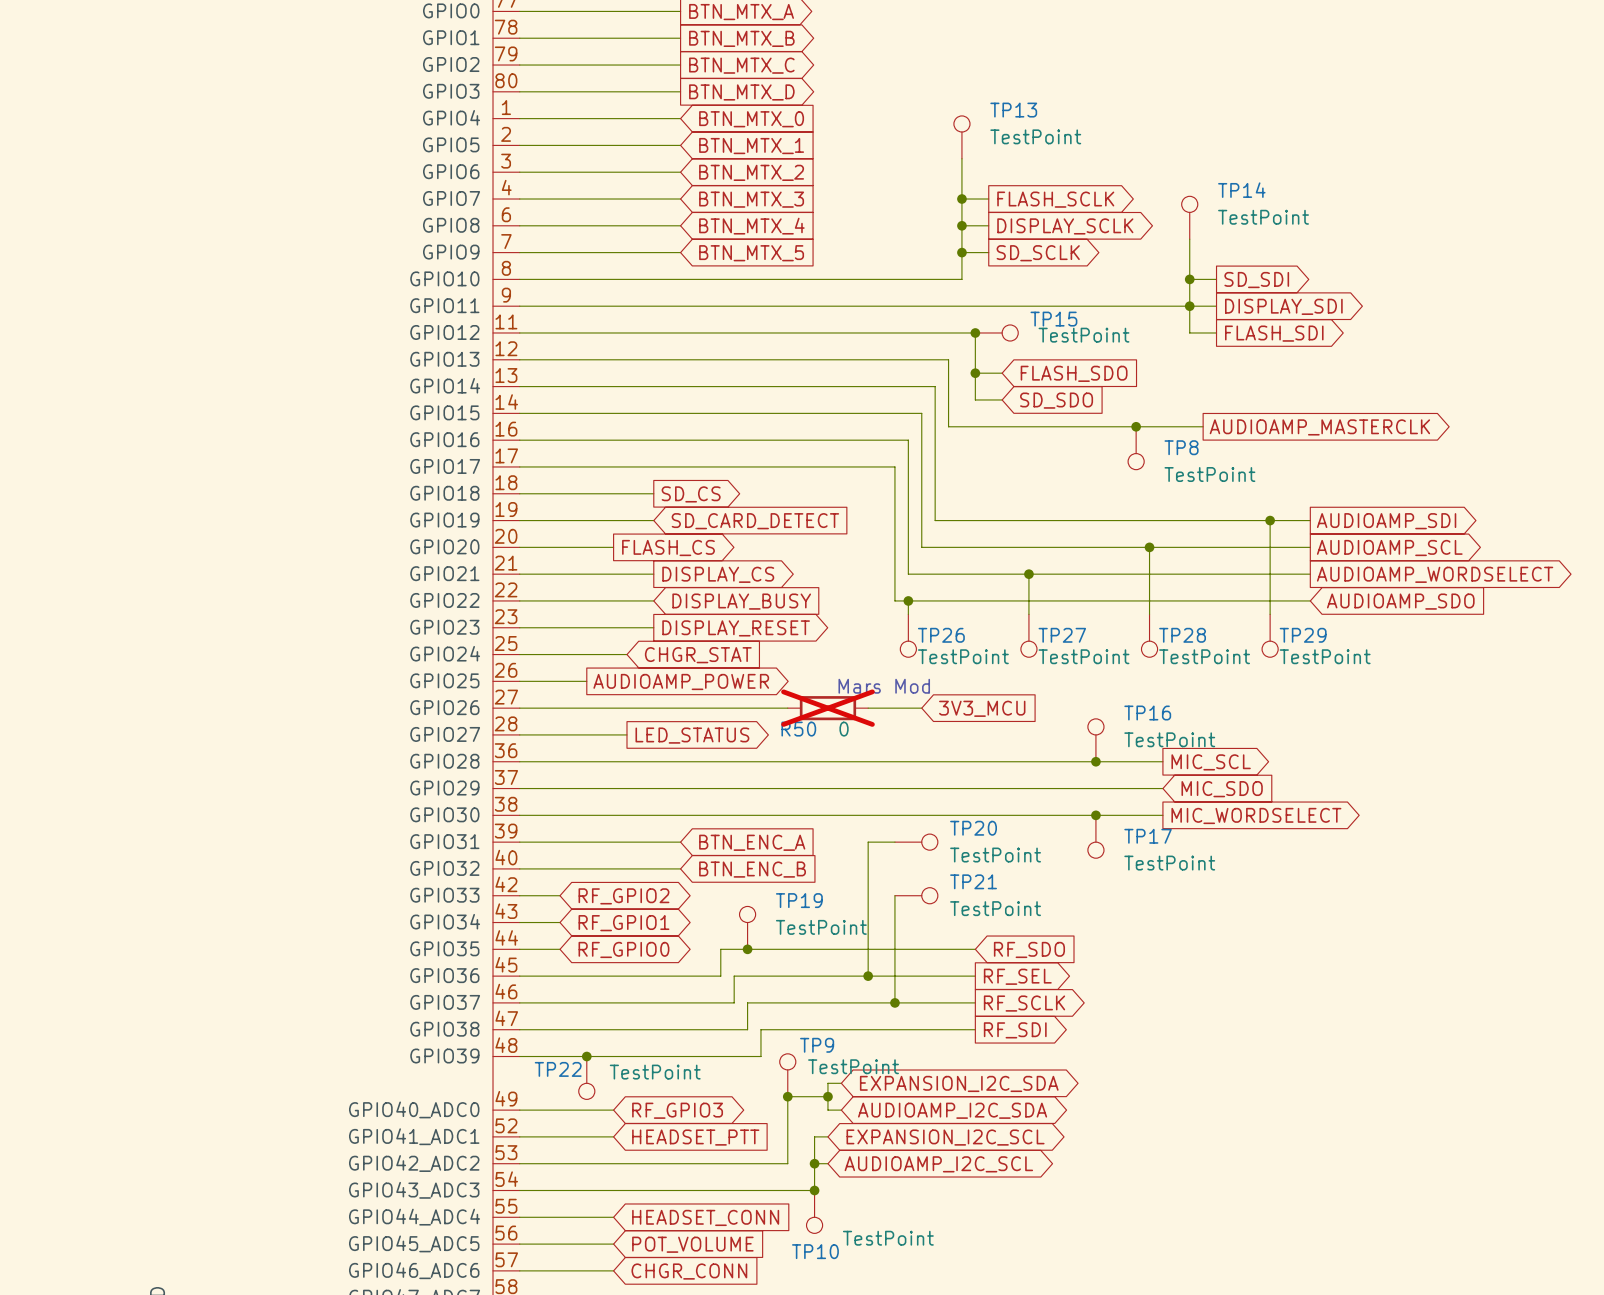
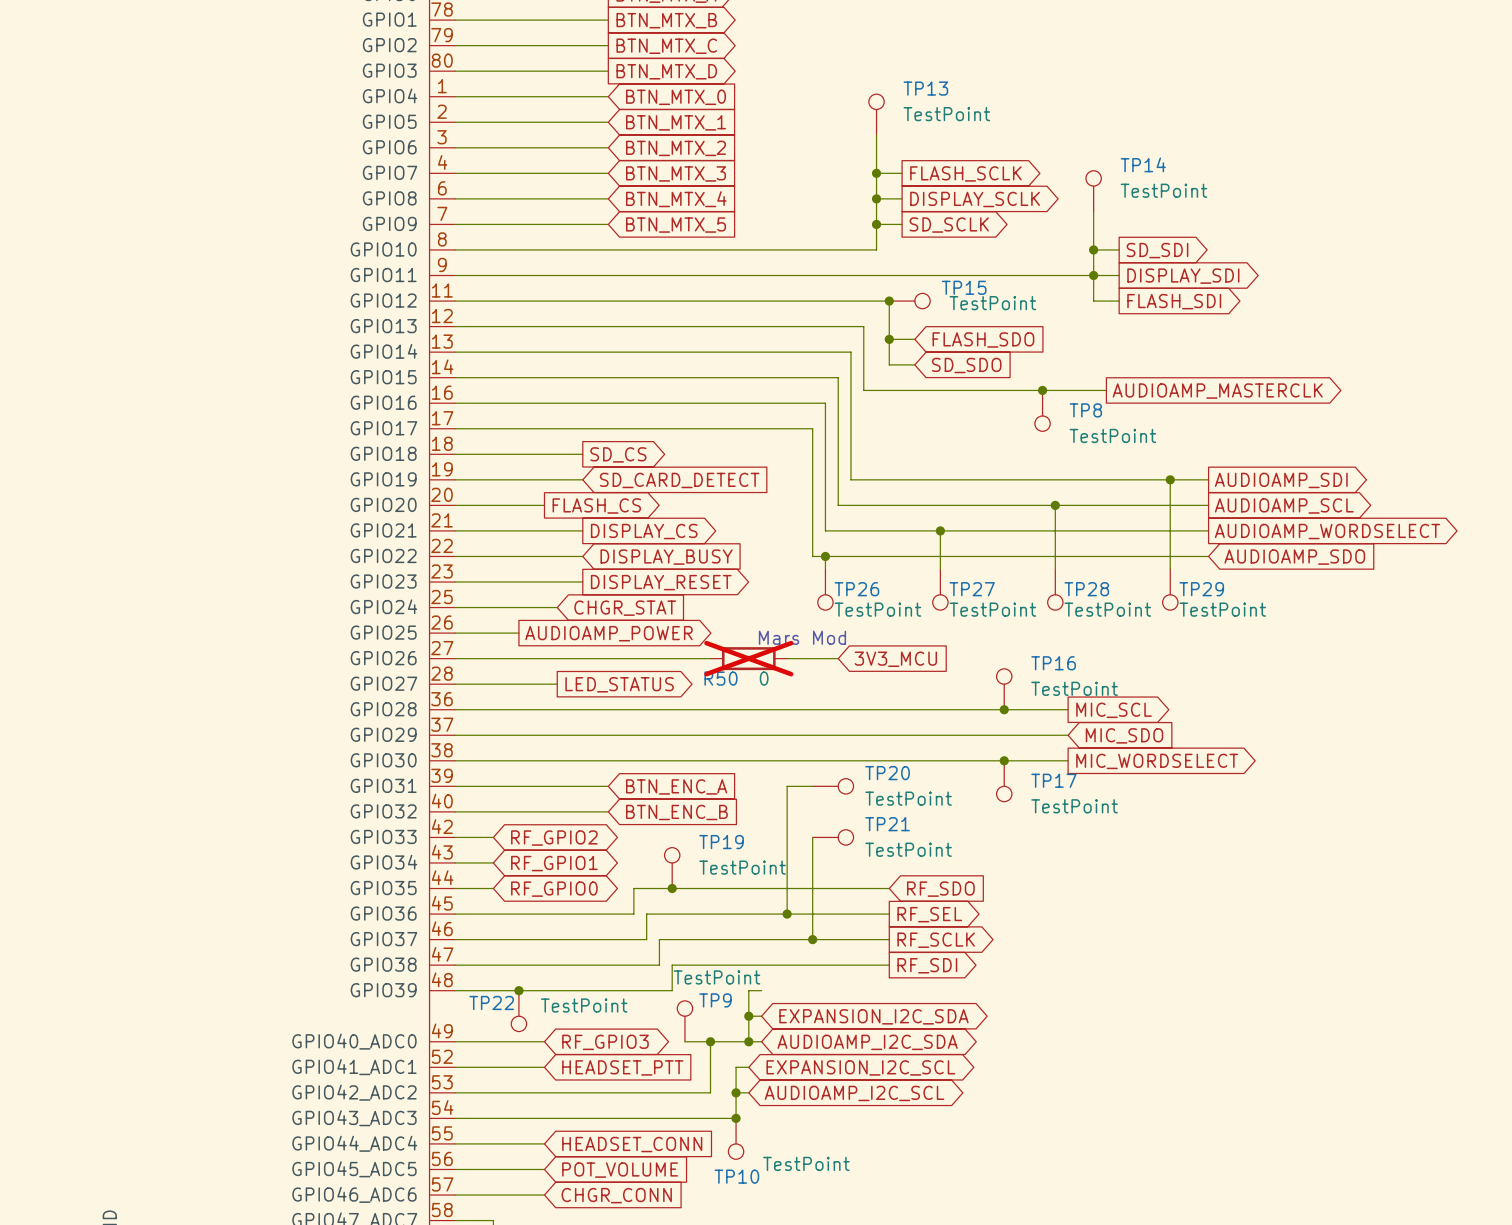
wire: (720, 949) (720, 976) (707, 976) -> (646, 888) (633, 888) (633, 914)
wire: (734, 976) (734, 1002) (720, 1002) -> (659, 914) (646, 914) (646, 939)
wire: (747, 1002) (747, 1029) (734, 1029) -> (672, 939) (659, 939) (659, 965)
wire: (760, 1029) (760, 1056) (747, 1056) -> (684, 965) (672, 965) (672, 990)
TP9 name position: TP9 (817, 1045) -> TP9 (715, 1000)
wire: none -> (761, 990) (748, 990) (748, 1016)
TP9 value position: TestPoint (853, 1066) -> TestPoint (716, 977)
TP9 position: (787, 1075) -> (684, 1021)
junction: none -> (748, 1016)
junction position: (787, 1096) -> (710, 1041)
wire: (827, 1096) (787, 1096) (787, 1110) -> none
junction: (827, 1096) -> none
wire: none -> (684, 1041) (748, 1041)
junction: none -> (748, 1041)

